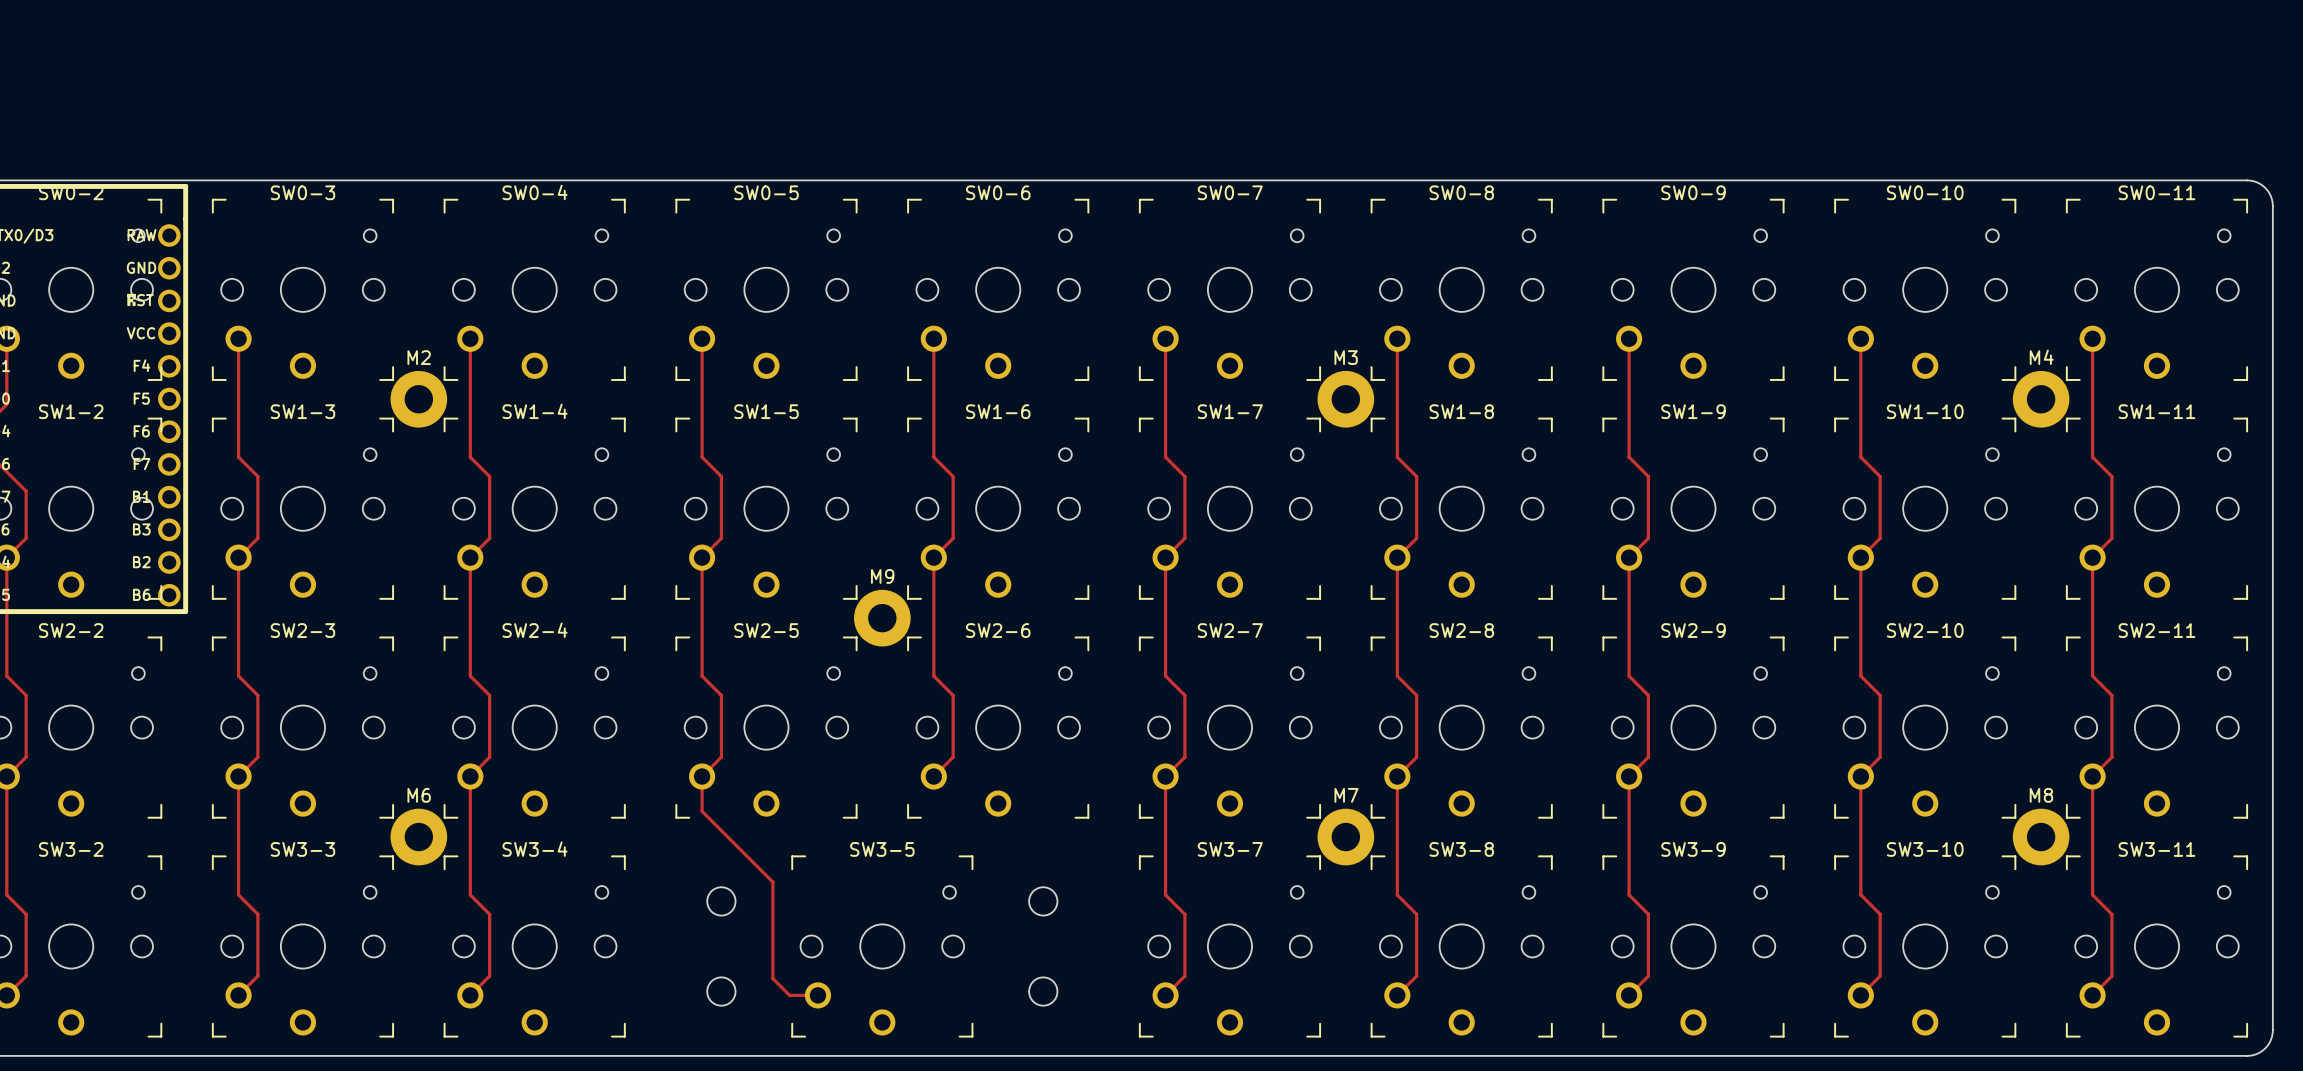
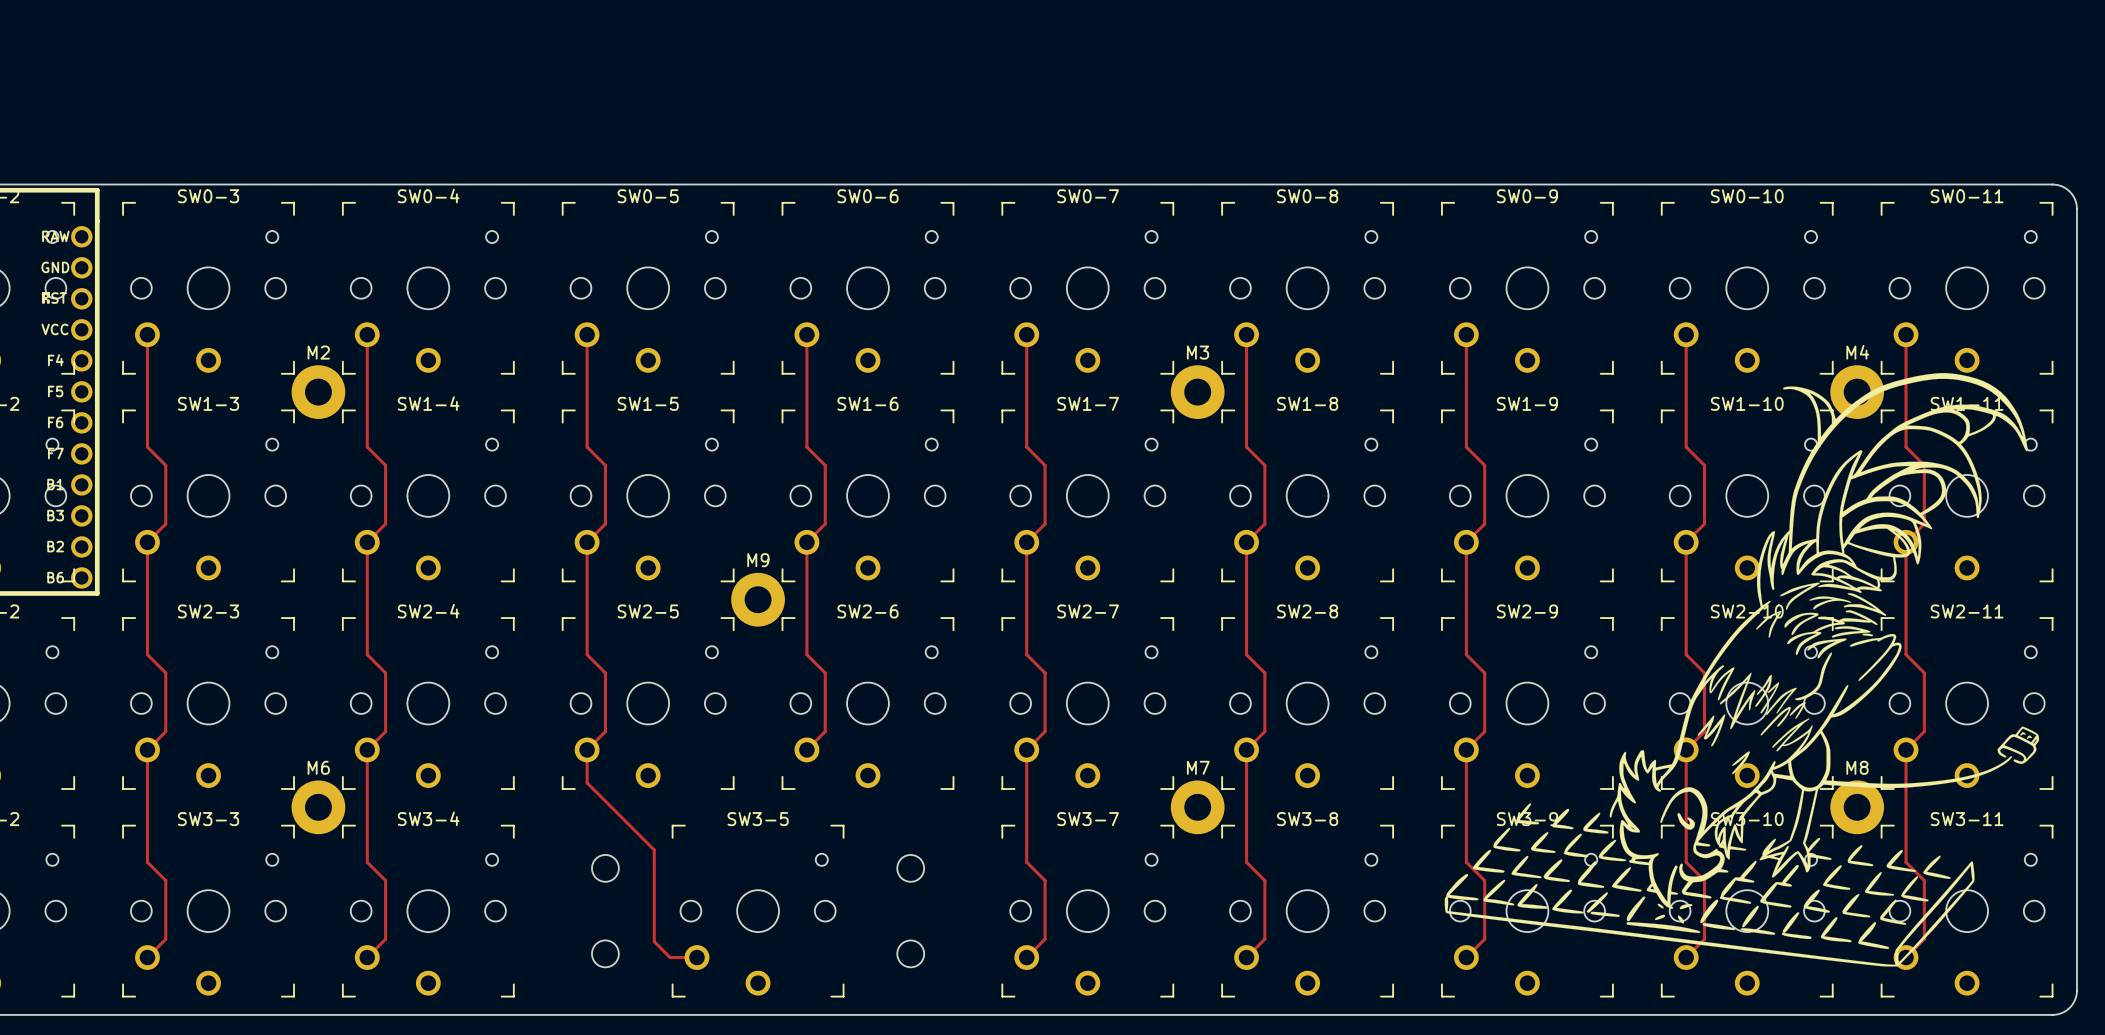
drawing: none -> [1444, 373, 2040, 967]

